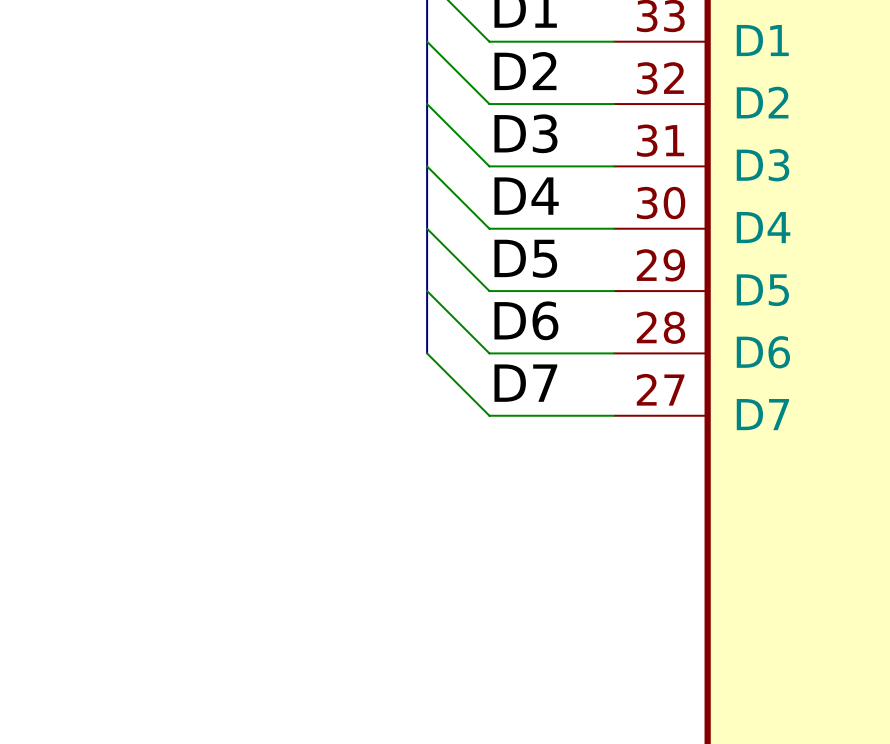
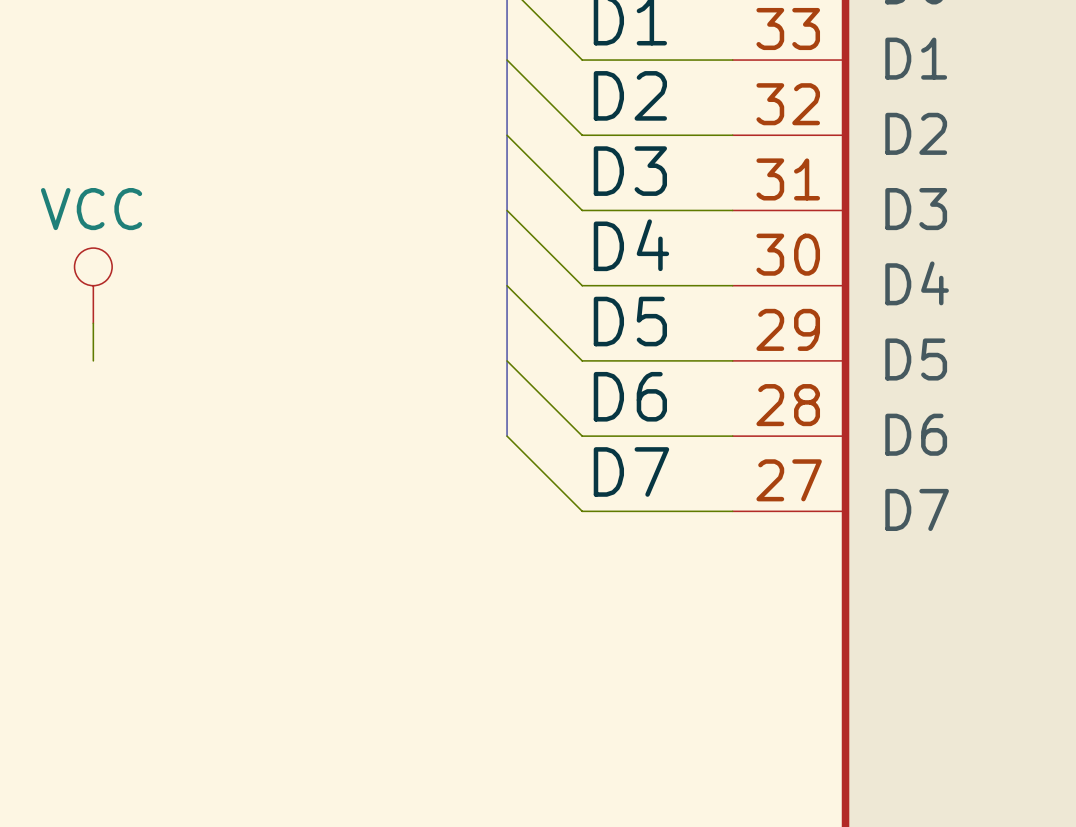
power symbol: none -> VCC (93, 285)
wire: none -> (93, 323) (93, 360)

